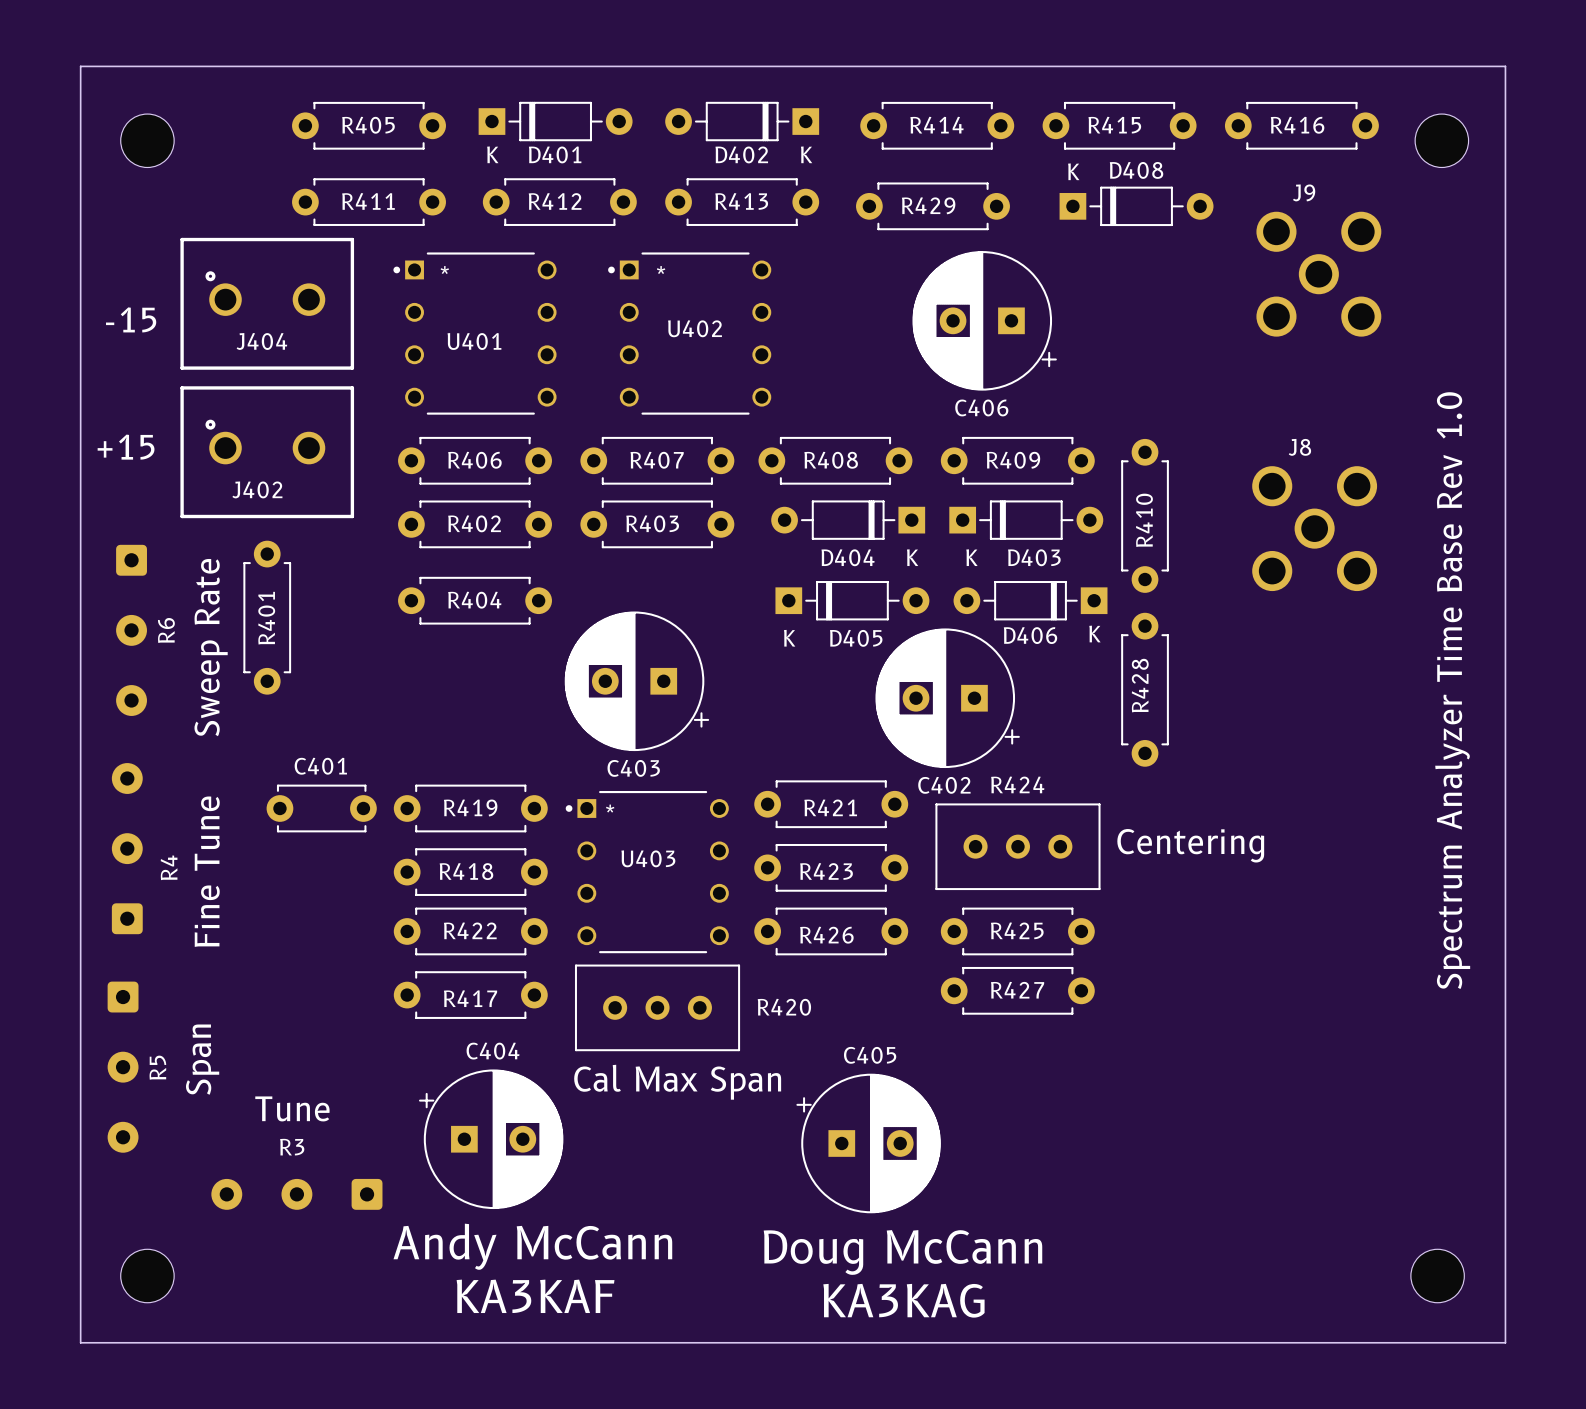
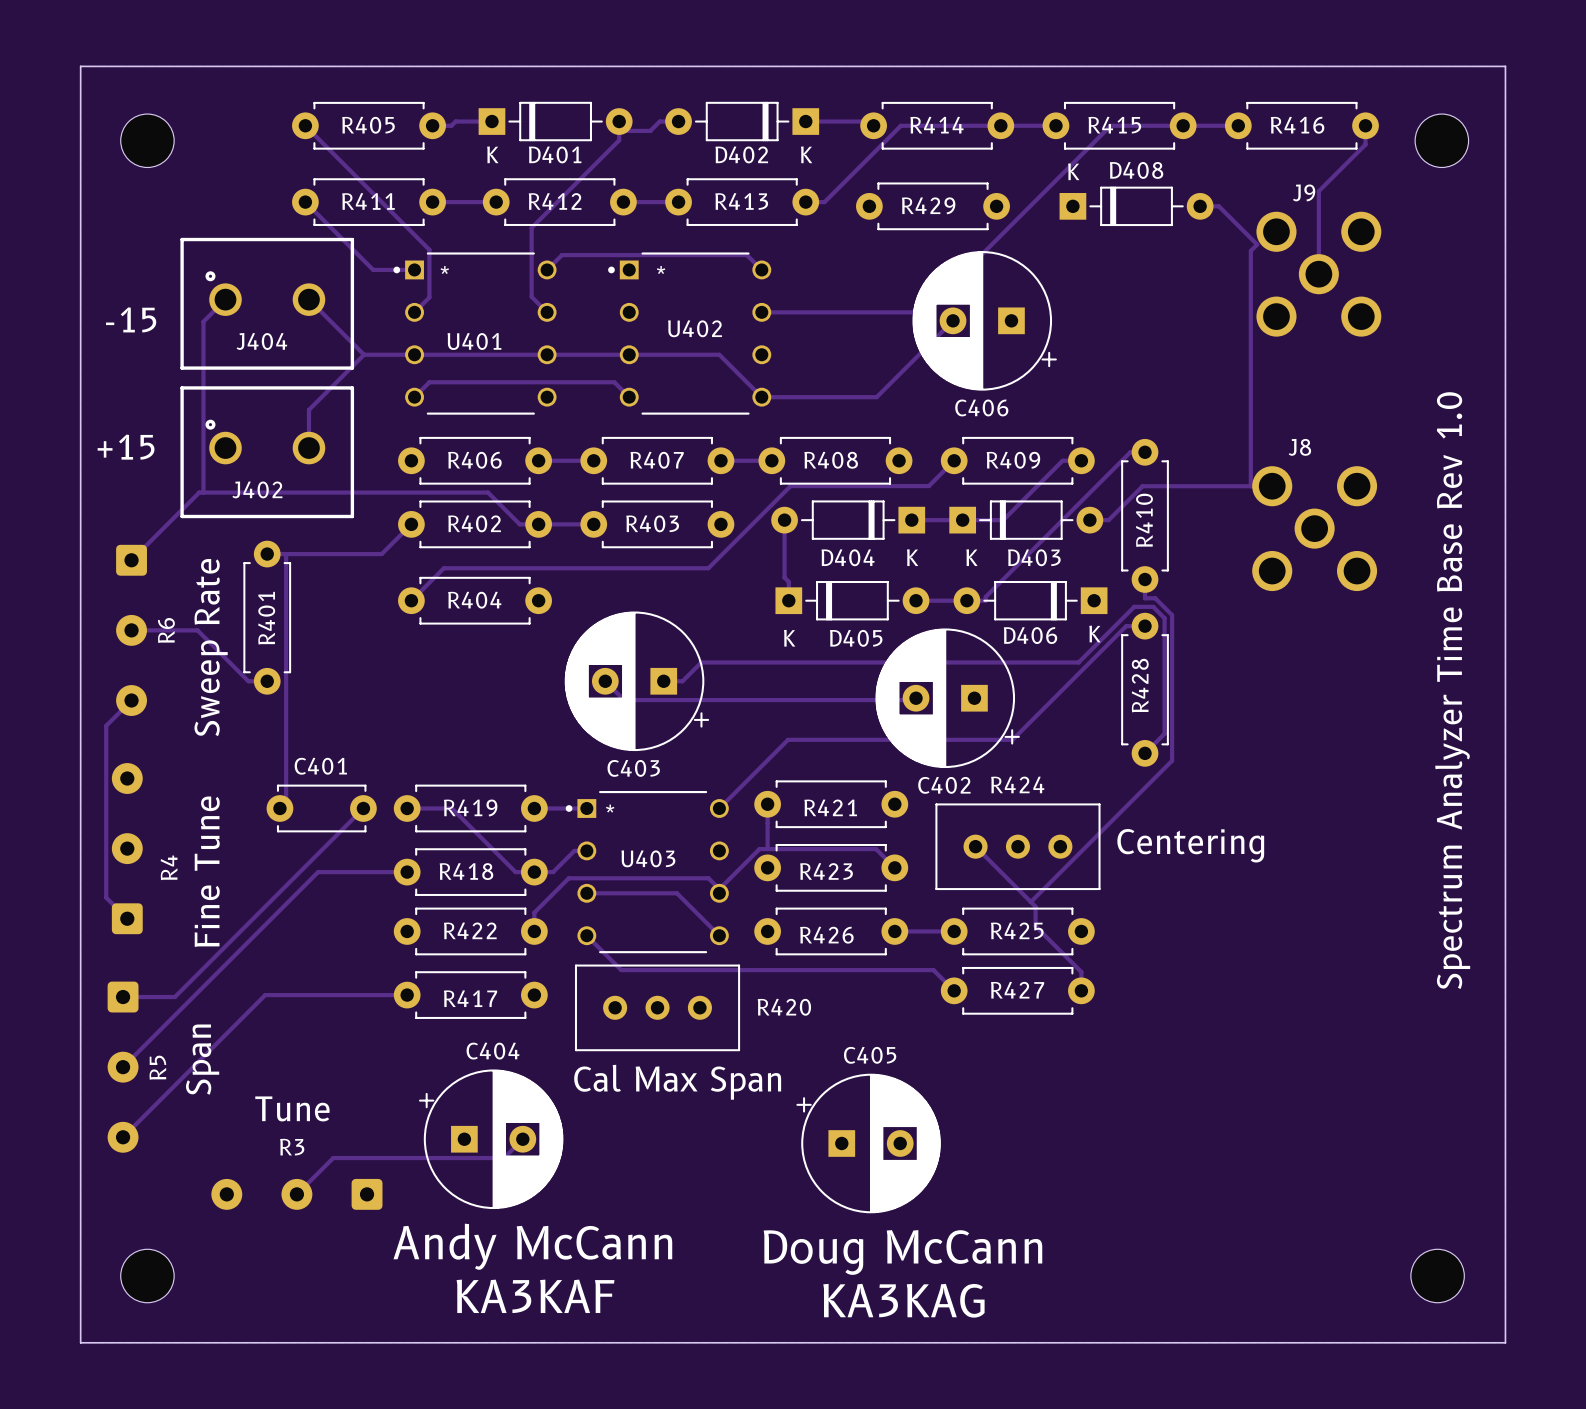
track: none -> (491, 121) (455, 121) (451, 125) (432, 125)
track: none -> (619, 121) (619, 140) (531, 227) (531, 296) (547, 312)
track: none -> (678, 121) (659, 121) (650, 130) (619, 130)
track: none -> (805, 121) (869, 121) (873, 125)
track: none -> (305, 125) (429, 249) (429, 297) (414, 312)
track: none -> (1055, 125) (900, 125) (824, 202) (805, 202)
track: none -> (1238, 125) (1110, 125) (924, 312) (761, 312)
track: none -> (1365, 125) (1365, 144) (1318, 191) (1318, 274)
track: none -> (305, 202) (373, 269) (414, 269)
track: none -> (432, 202) (496, 202)
track: none -> (623, 202) (678, 202)
track: none -> (1200, 206) (1218, 206) (1257, 244) (1250, 250) (1250, 486)
track: none -> (547, 269) (561, 255) (746, 255) (761, 269)
track: none -> (225, 299) (203, 321) (203, 492)
track: none -> (308, 299) (364, 354)
track: none -> (953, 320) (876, 397) (761, 397) (719, 354) (364, 354)
track: none -> (364, 354) (308, 409) (308, 448)
track: none -> (414, 397) (429, 382) (614, 382) (629, 397)
track: none -> (1145, 452) (1130, 452) (985, 596) (985, 600) (916, 600)
track: none -> (538, 460) (593, 460)
track: none -> (720, 460) (771, 460)
track: none -> (954, 460) (928, 486) (790, 486) (708, 568) (443, 568) (411, 600)
track: none -> (1081, 460) (1062, 460) (1003, 520) (911, 520)
track: none -> (1272, 486) (1142, 486) (1108, 520) (1089, 520)
track: none -> (784, 520) (784, 577) (788, 581) (788, 600)
track: none -> (411, 524) (381, 554) (267, 554)
track: none -> (593, 524) (519, 524) (488, 492) (199, 492) (131, 560)
track: none -> (286, 554) (286, 802) (279, 808)
track: none -> (1145, 579) (1145, 598) (1155, 598) (1172, 615) (1172, 760) (1030, 901)
track: none -> (1145, 626) (1126, 626) (1012, 739) (788, 739) (719, 808)
track: none -> (131, 630) (197, 630) (248, 681) (267, 681)
track: none -> (605, 681) (624, 700) (914, 700) (916, 698)
track: none -> (663, 681) (682, 681) (701, 662) (1078, 662) (1134, 606) (1153, 606) (1164, 618) (1164, 733) (1145, 753)
track: none -> (131, 700) (106, 725) (106, 897) (127, 918)
track: none -> (767, 804) (767, 849)
track: none -> (363, 808) (174, 997) (123, 997)
track: none -> (407, 808) (451, 808) (515, 872) (553, 872) (574, 850) (586, 850)
track: none -> (534, 808) (586, 808)
track: none -> (975, 846) (1030, 901)
track: none -> (894, 867) (876, 849) (759, 849) (719, 889)
track: none -> (407, 872) (318, 872) (123, 1067)
track: none -> (719, 889) (708, 878) (568, 878) (534, 912) (534, 931)
track: none -> (586, 893) (676, 893) (719, 935)
track: none -> (1030, 901) (1035, 906) (1035, 926) (1081, 972) (1081, 990)
track: none -> (894, 931) (954, 931)
track: none -> (586, 935) (621, 970) (933, 970) (954, 990)
track: none -> (407, 995) (265, 995) (123, 1137)
track: none -> (522, 1139) (504, 1158) (333, 1158) (296, 1194)

